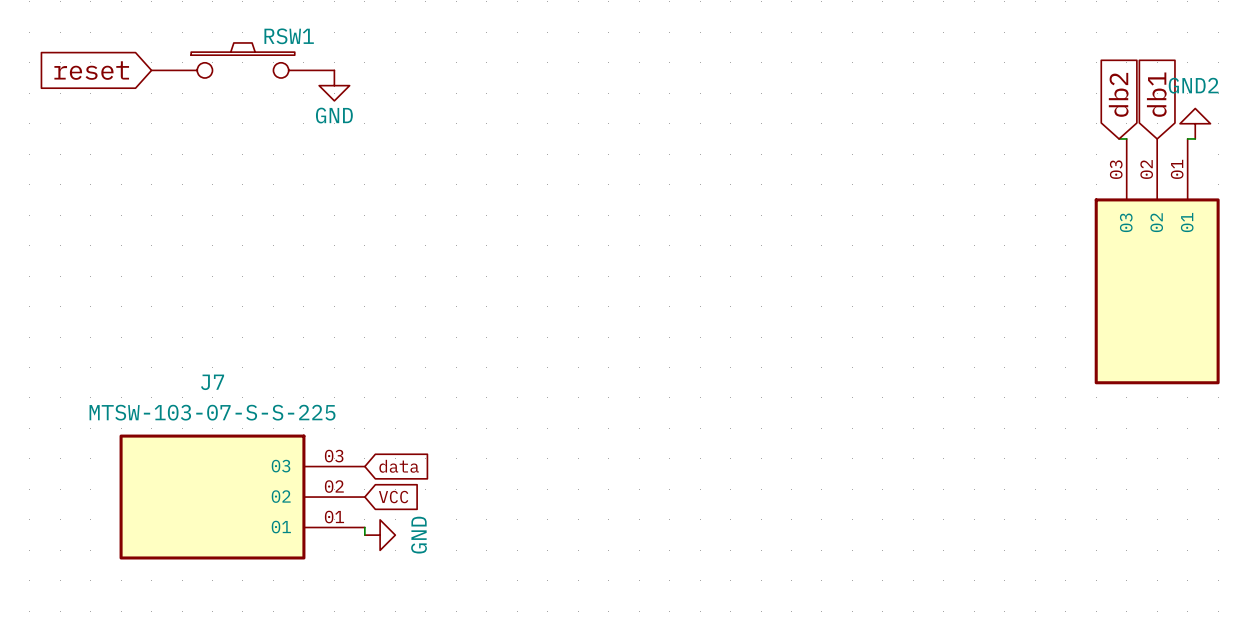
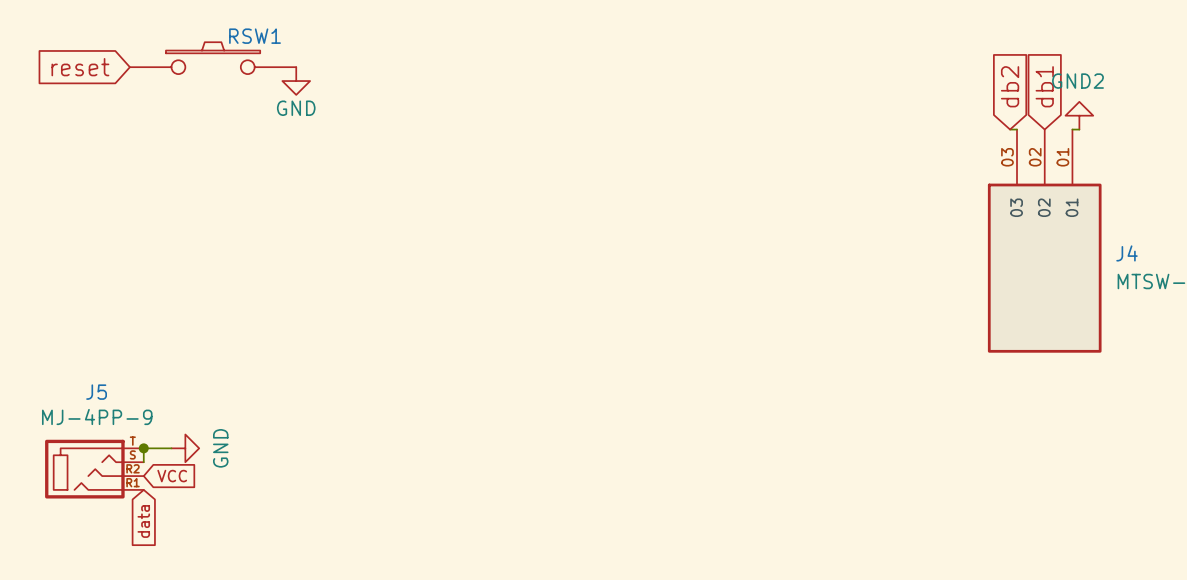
global label rotation: 0° (399, 466) -> 90° clockwise (143, 521)
global label position: data (399, 466) -> data (143, 521)
junction: none -> (143, 448)
J7: MTSW-103-07-S-S-225 (242, 497) -> none
global label position: VCC (393, 497) -> VCC (172, 476)
J5: none -> MJ-4PP-9 (94, 469)
wire: (364, 527) (364, 535) -> none
power symbol position: GND (380, 535) -> GND (185, 448)

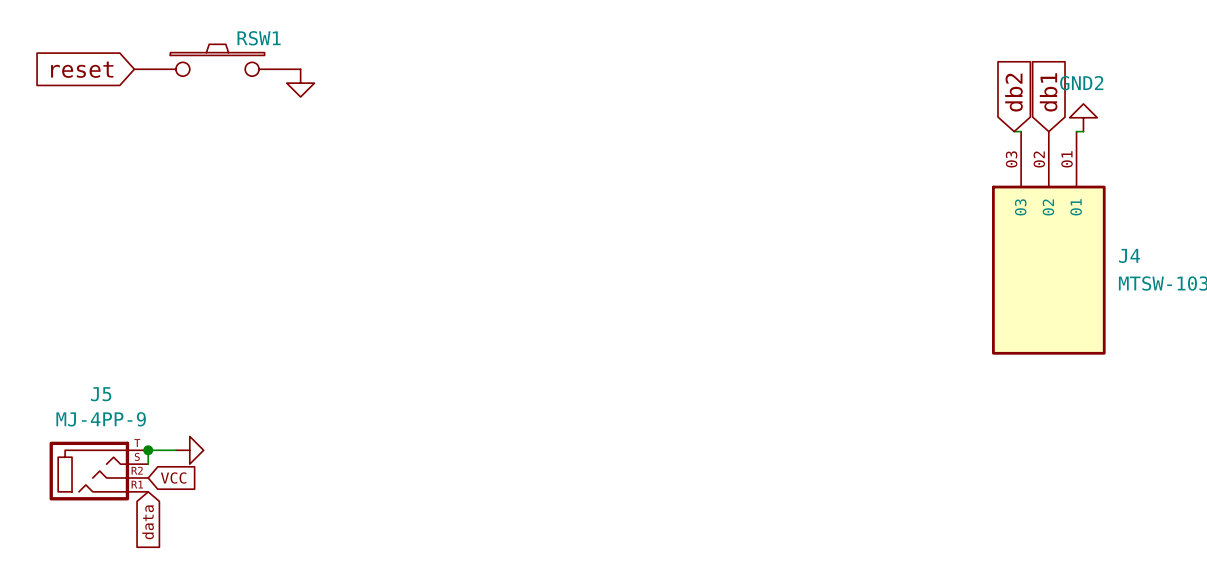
power symbol text: GND (296, 108) -> none
power symbol text: GND (220, 448) -> none

